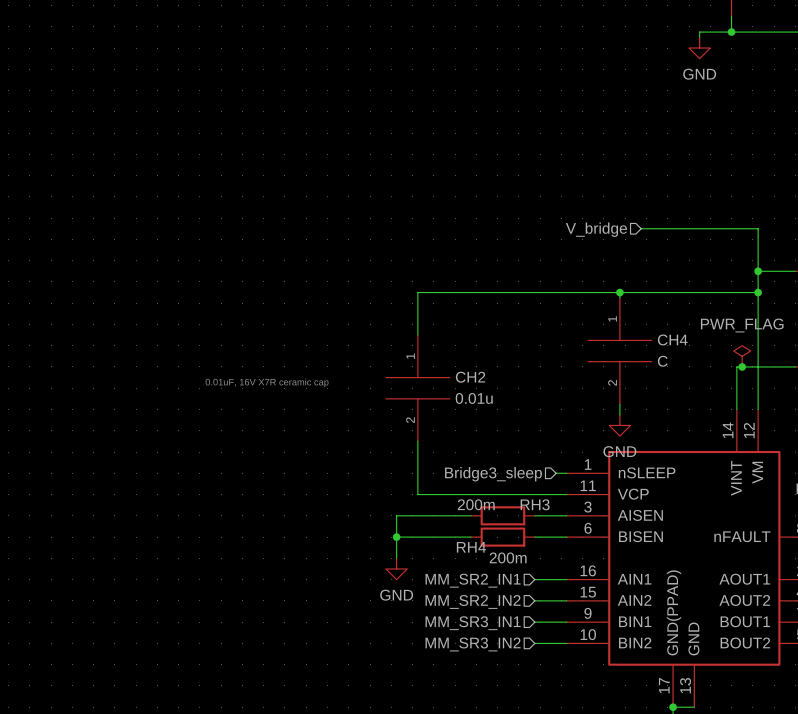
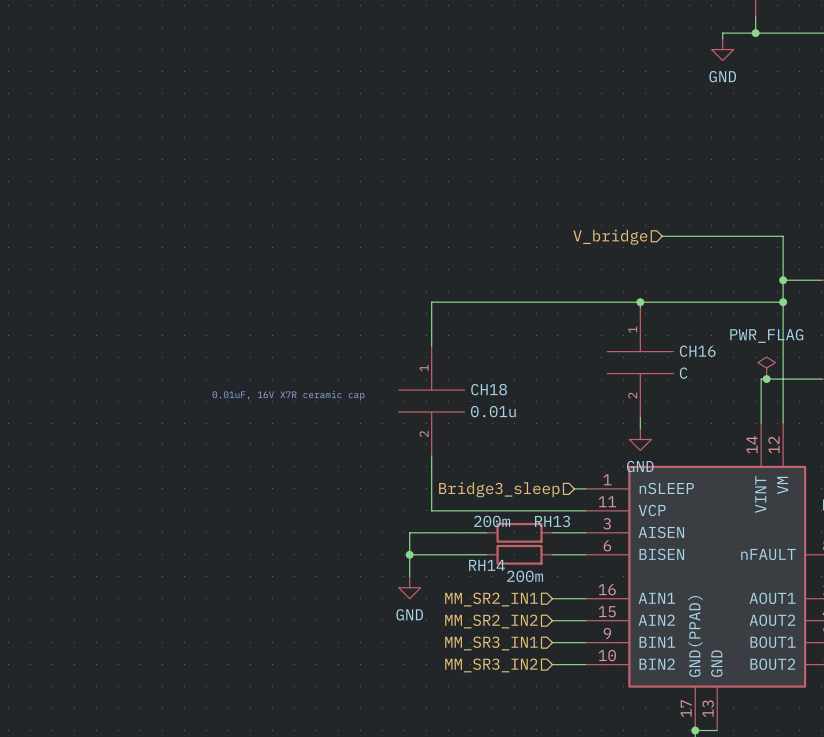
CH4 name: CH4 (672, 339) -> CH16 (697, 351)
CH2 name: CH2 (470, 377) -> CH18 (489, 389)
RH3 name: RH3 (535, 504) -> RH13 (552, 521)
RH4 name: RH4 (471, 547) -> RH14 (486, 565)

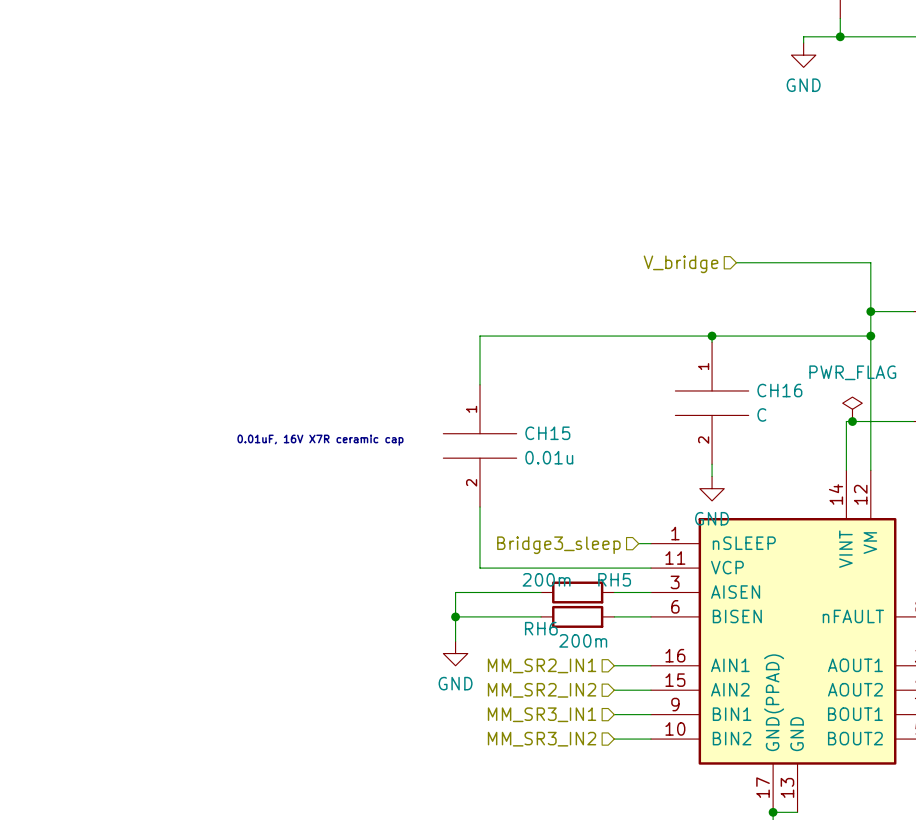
CH18 name: CH18 (489, 389) -> CH15 (547, 433)
RH13 name: RH13 (552, 521) -> RH5 (614, 579)
RH14 name: RH14 (486, 565) -> RH6 (541, 628)

